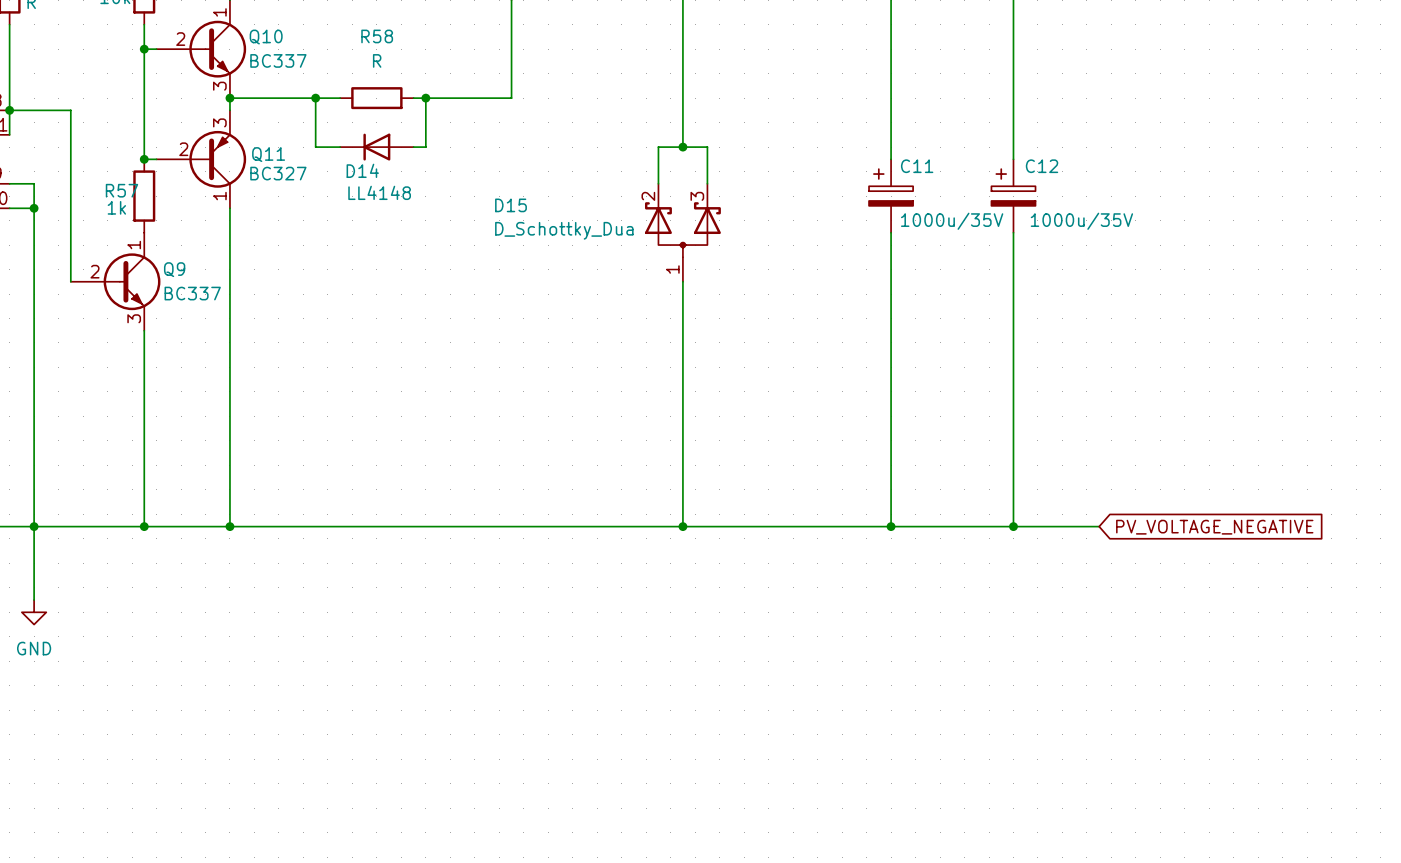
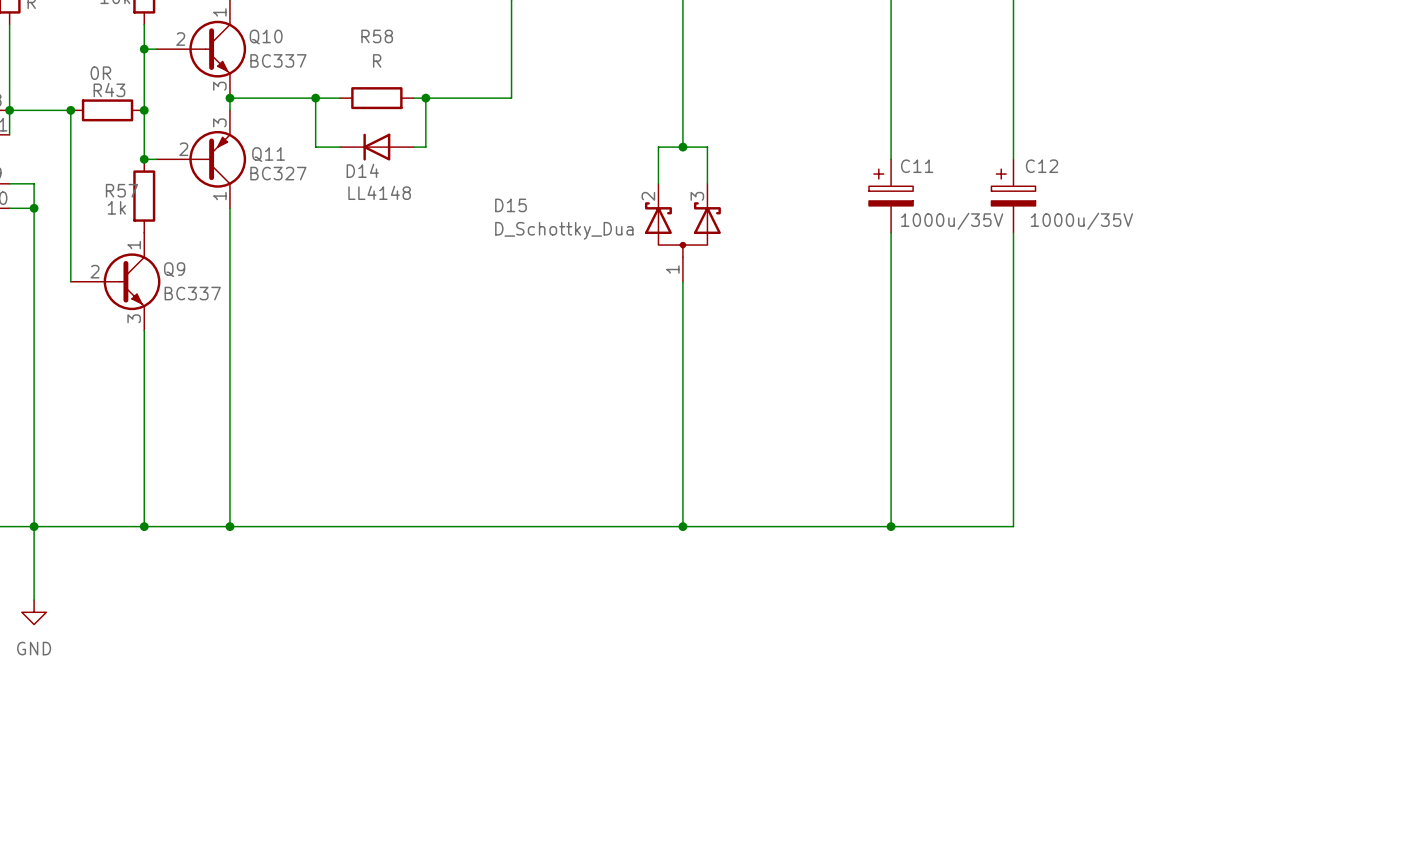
junction: none -> (70, 110)
R43: none -> 0R (107, 110)
junction: none -> (144, 110)
wire: (1013, 526) (1099, 526) -> none
junction: (1013, 526) -> none
global label: PV_VOLTAGE_NEGATIVE (1214, 527) -> none

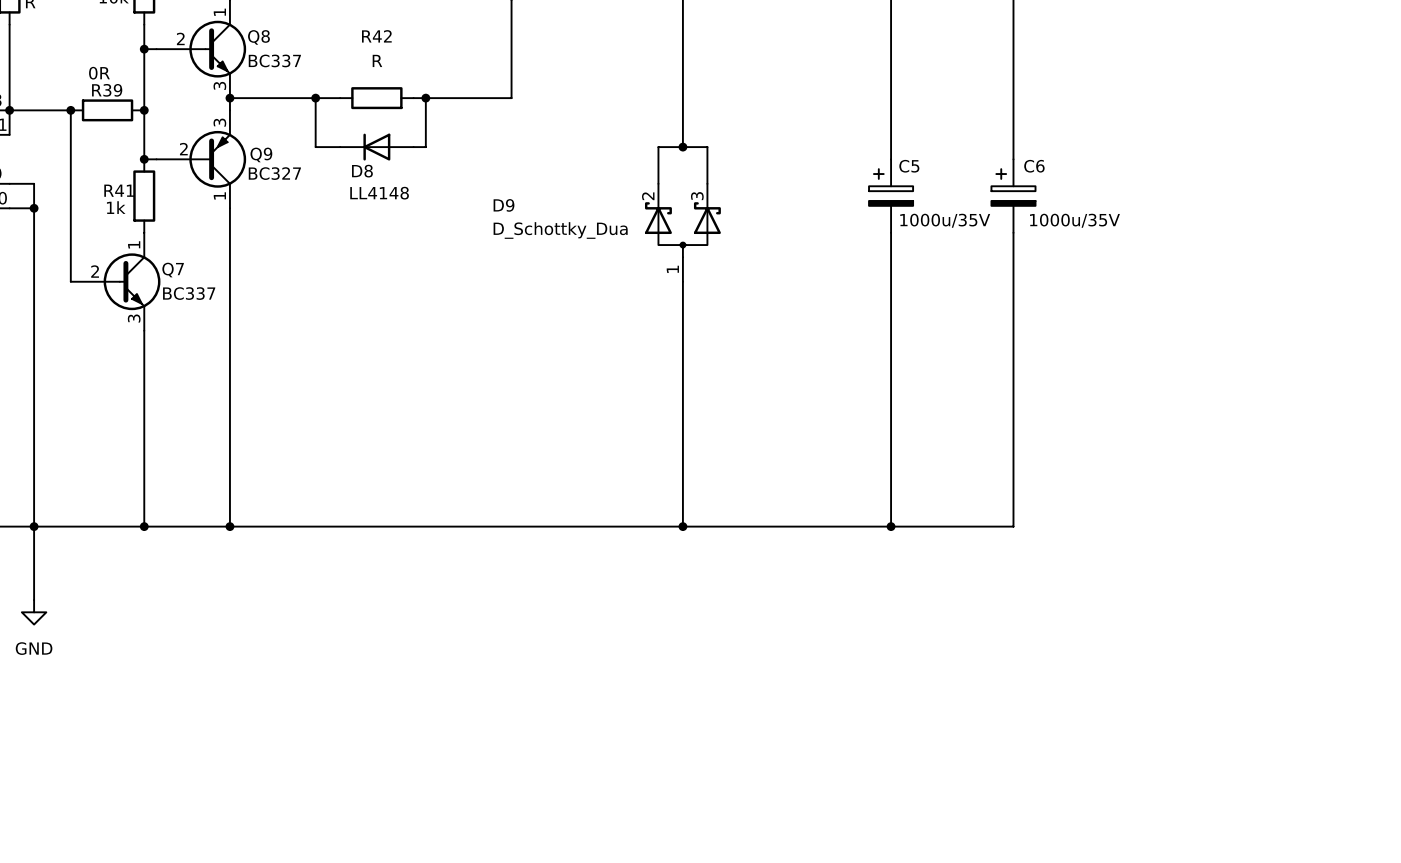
R58 name: R58 (377, 36) -> R42 (376, 36)
Q10 name: Q10 (266, 37) -> Q8 (258, 37)
R43 name: R43 (109, 90) -> R39 (107, 90)
Q11 name: Q11 (268, 154) -> Q9 (261, 154)
C11 name: C11 (917, 166) -> C5 (909, 166)
C12 name: C12 (1042, 166) -> C6 (1034, 166)
D14 name: D14 (362, 170) -> D8 (362, 171)
R57 name: R57 (121, 190) -> R41 (119, 190)
D15 name: D15 (510, 205) -> D9 (504, 205)
Q9 name: Q9 (174, 269) -> Q7 (173, 270)

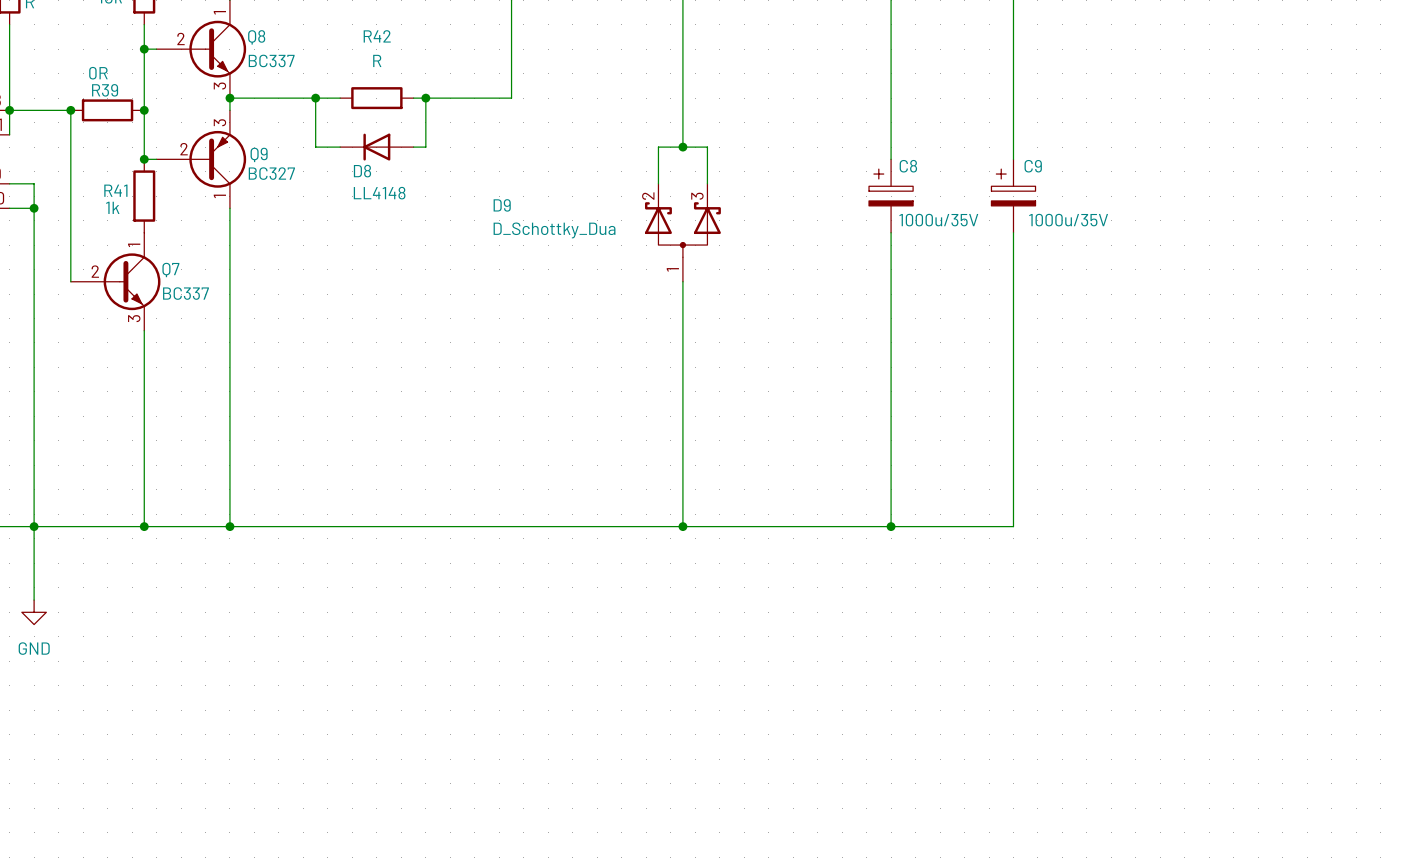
C5 name: C5 (909, 166) -> C8 (908, 166)
C6 name: C6 (1034, 166) -> C9 (1033, 166)

